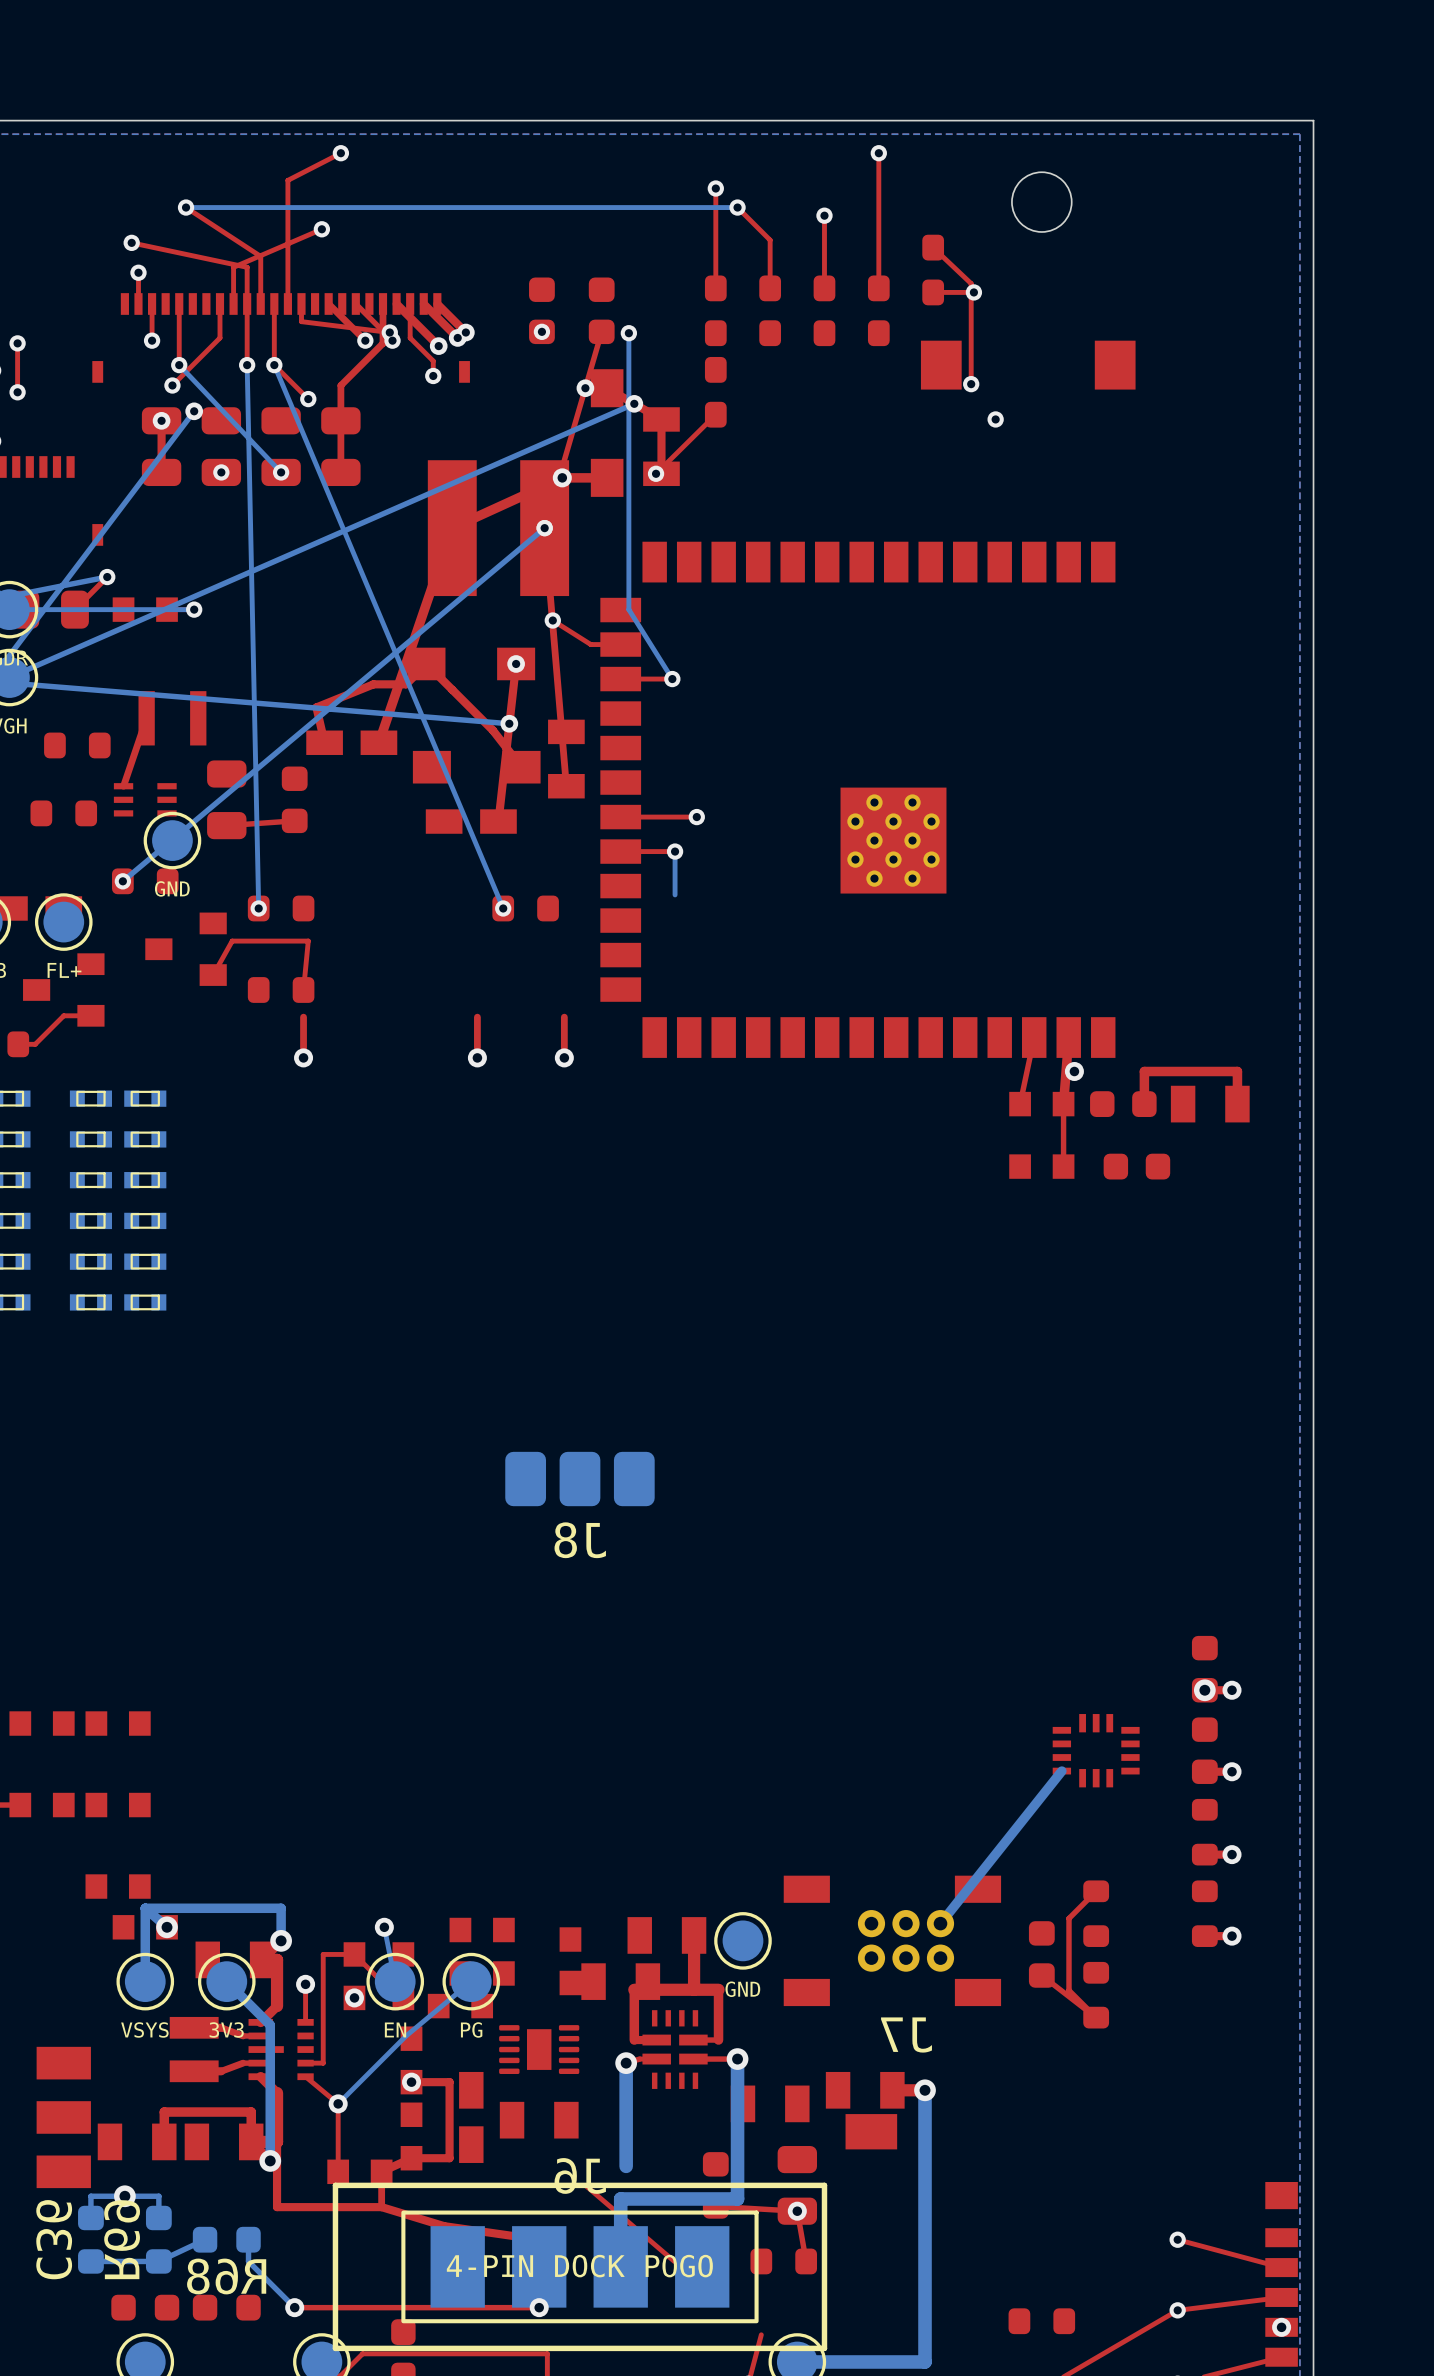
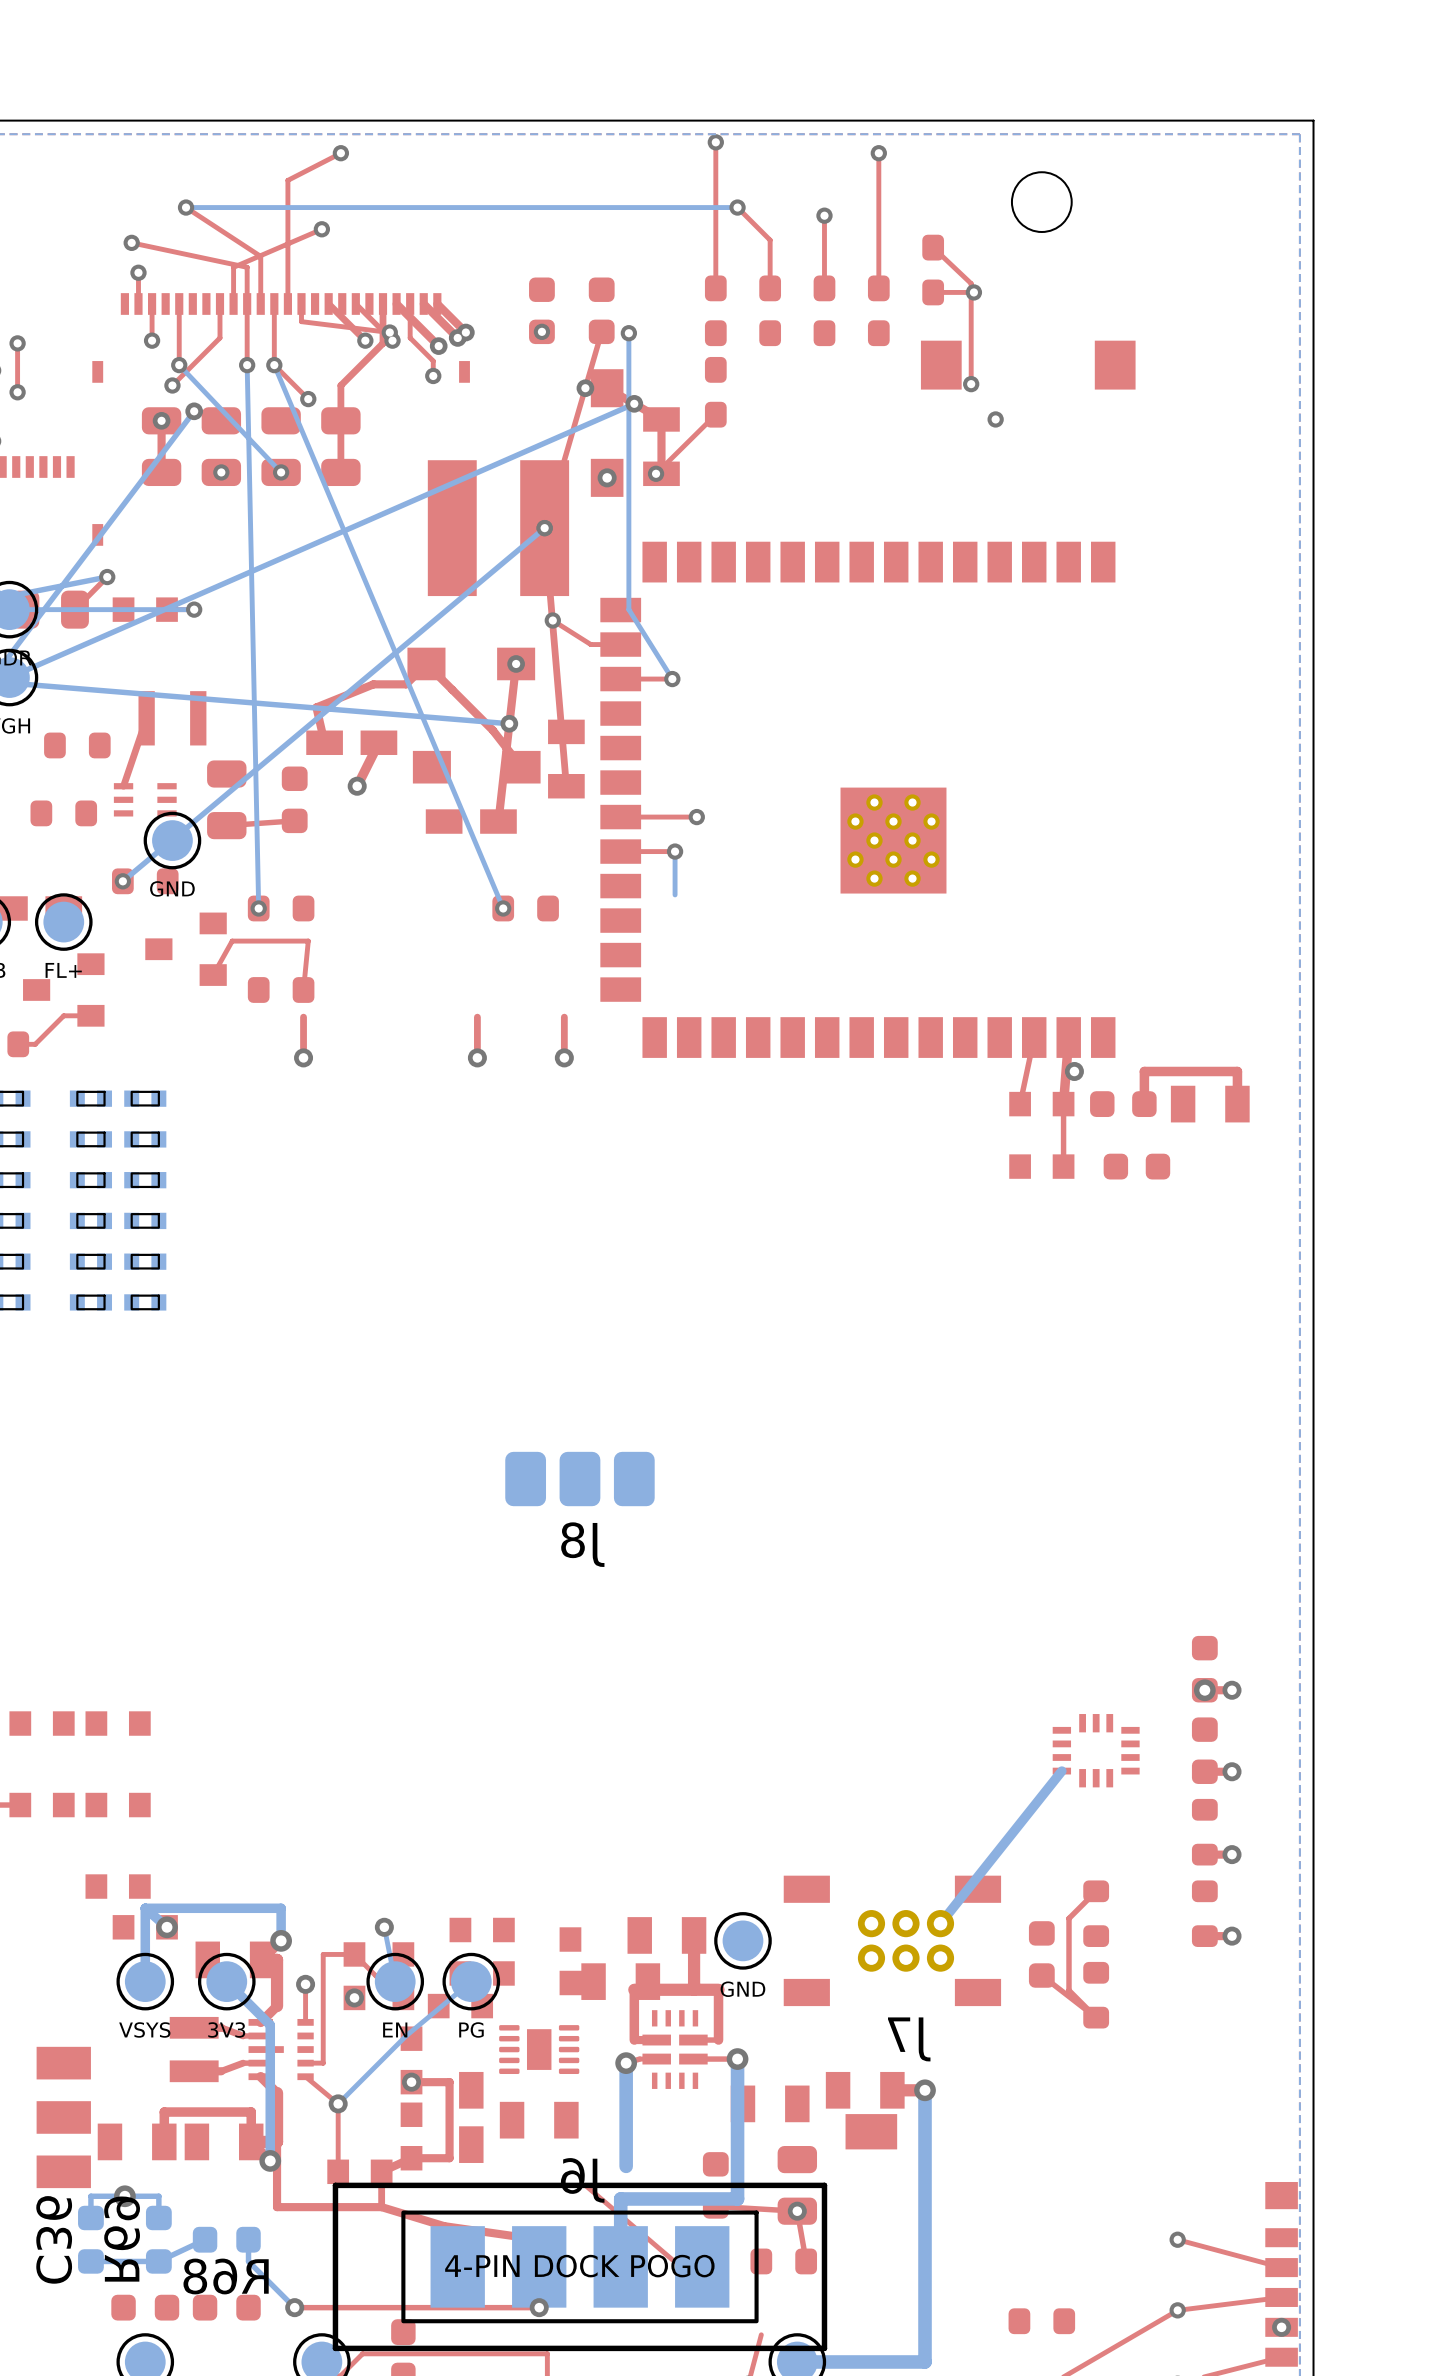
top track: none -> (715, 142) (715, 188)
via position: (715, 188) -> (715, 142)
via position: (562, 477) -> (607, 477)
top track: (607, 477) (562, 477) (452, 528) (378, 742) -> (357, 786) (378, 742)
via: none -> (357, 786)

